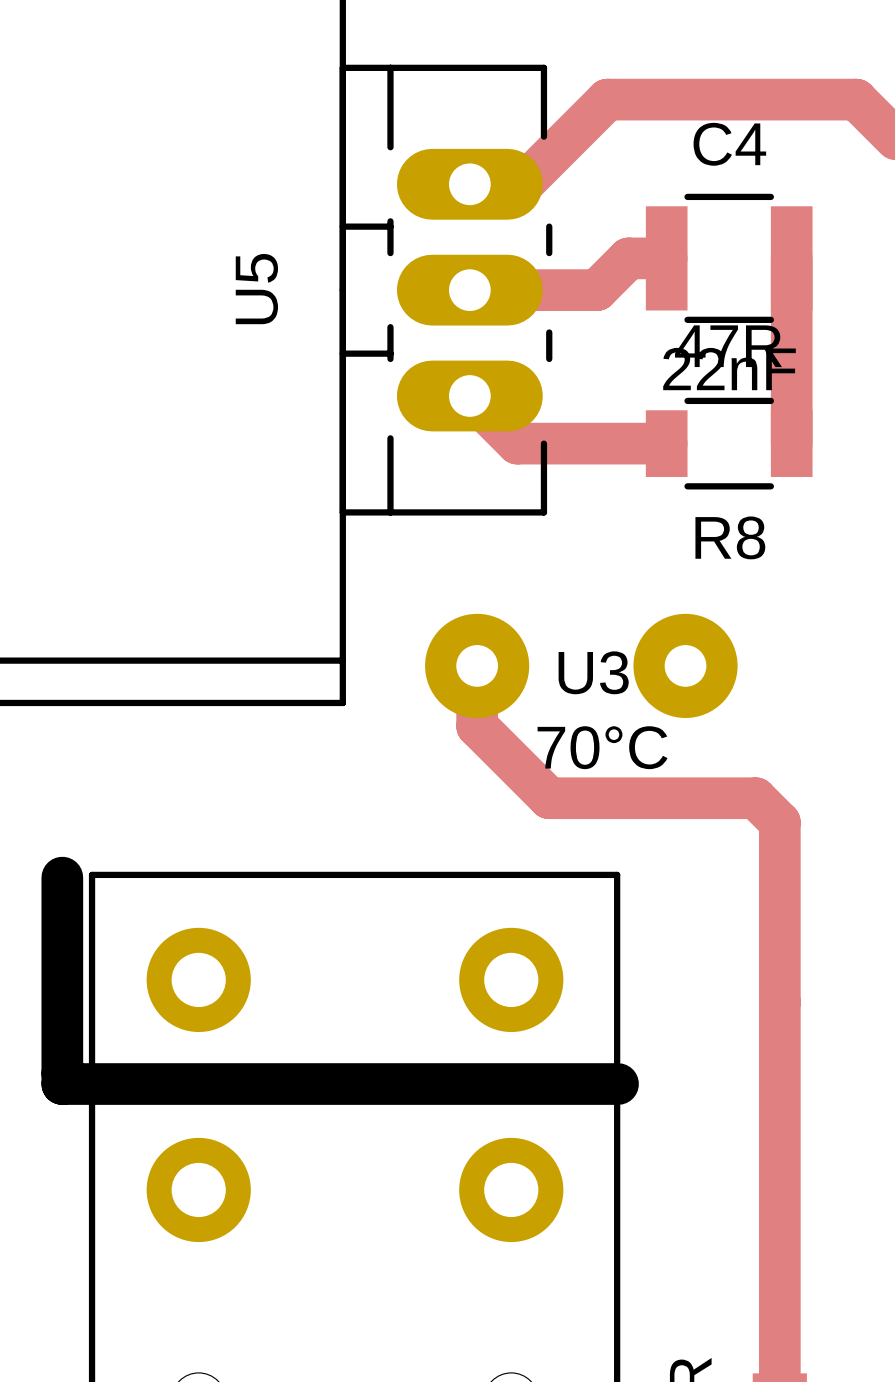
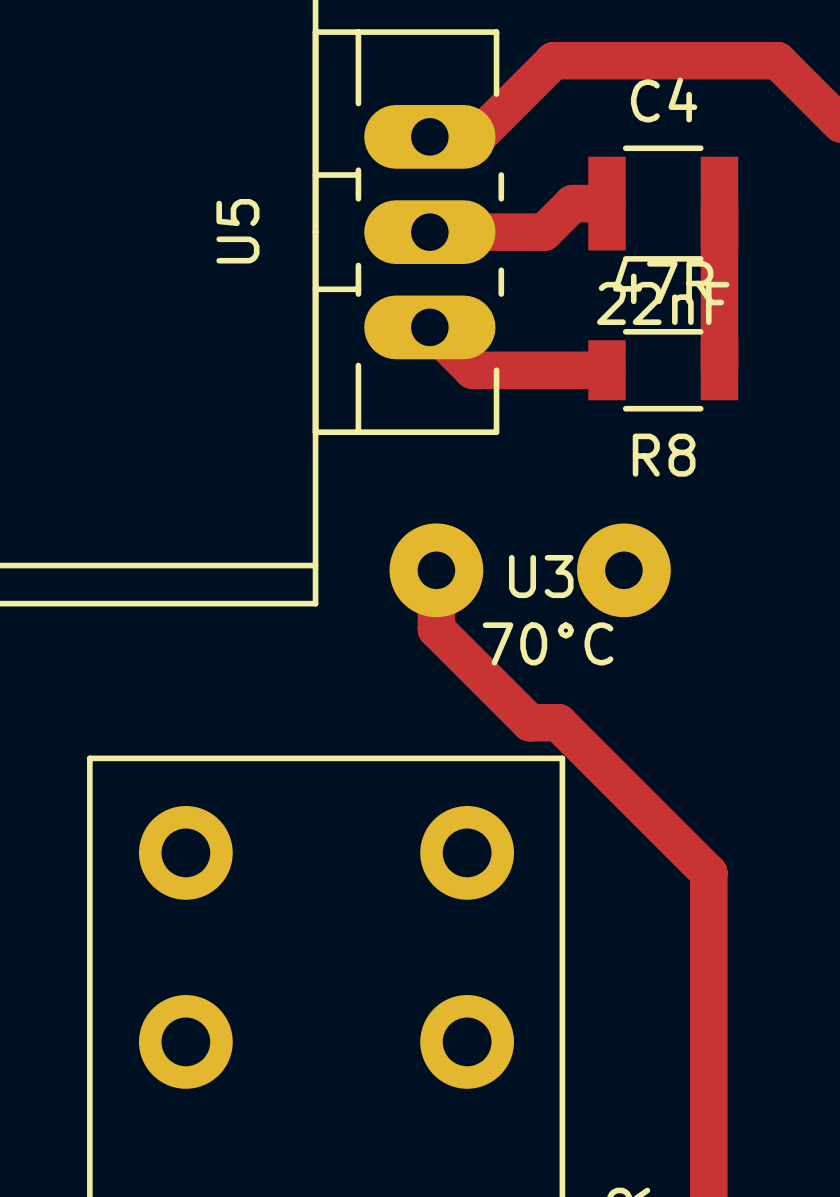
track: (477, 726) (549, 798) (755, 798) (779, 822) (779, 1002) -> (436, 624) (436, 629) (529, 722) (558, 722) (708, 873)
board edge: (62, 877) (62, 1084) (618, 1084) -> none

